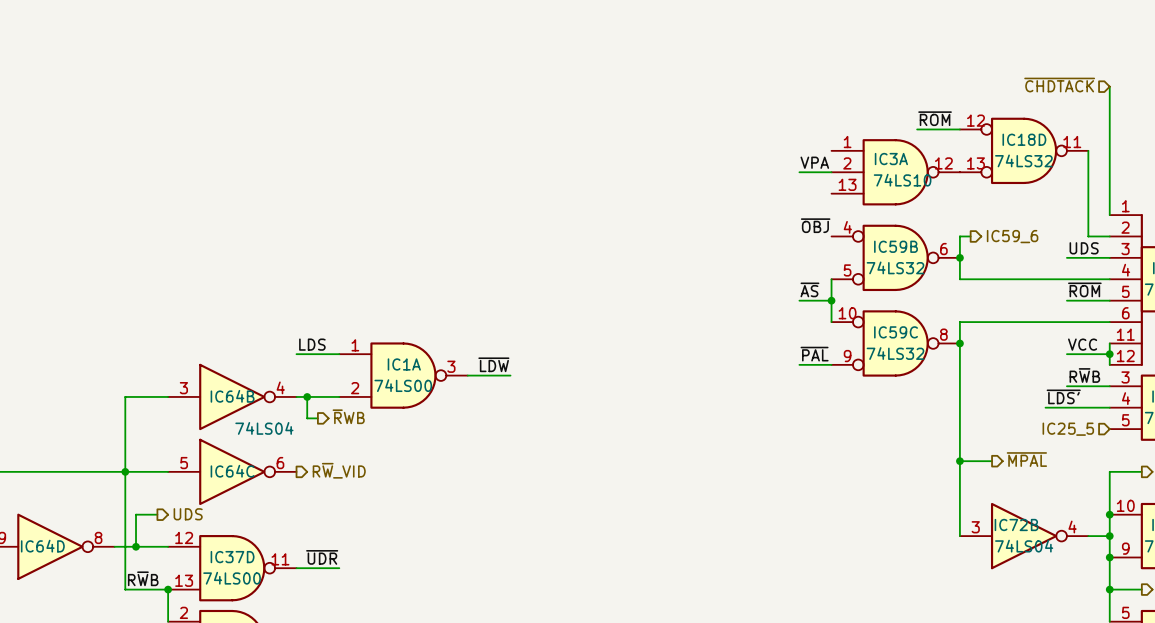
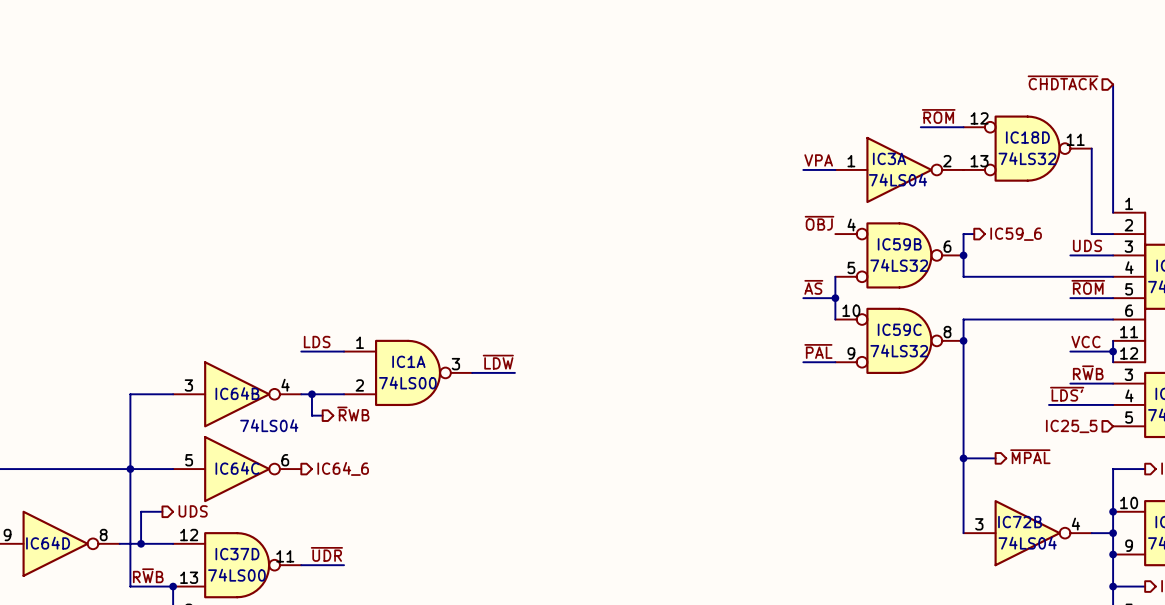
IC3A symbol: [831, 139, 960, 206] -> [835, 136, 964, 204]
IC3A value: 74LS10 (902, 180) -> 74LS04 (898, 180)
hierarchical label: R~{W}_VID (339, 470) -> IC64_6 (343, 468)

